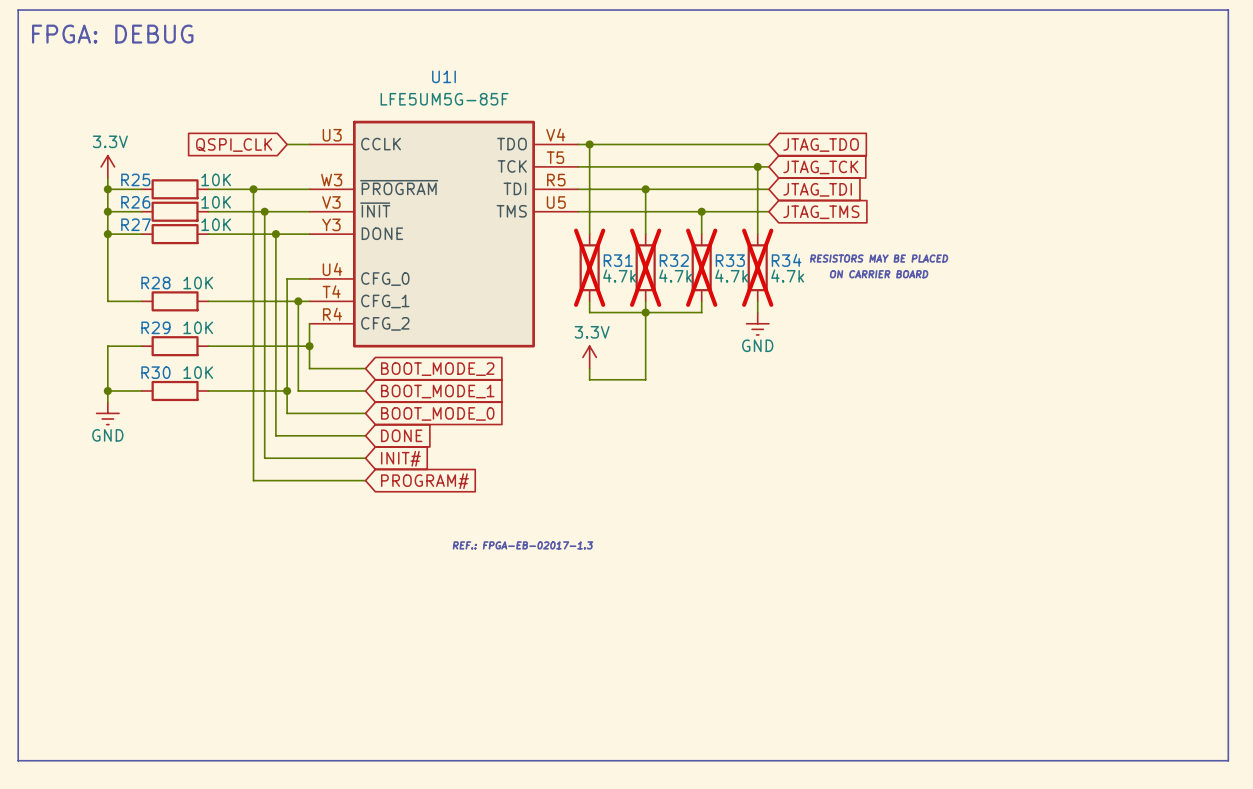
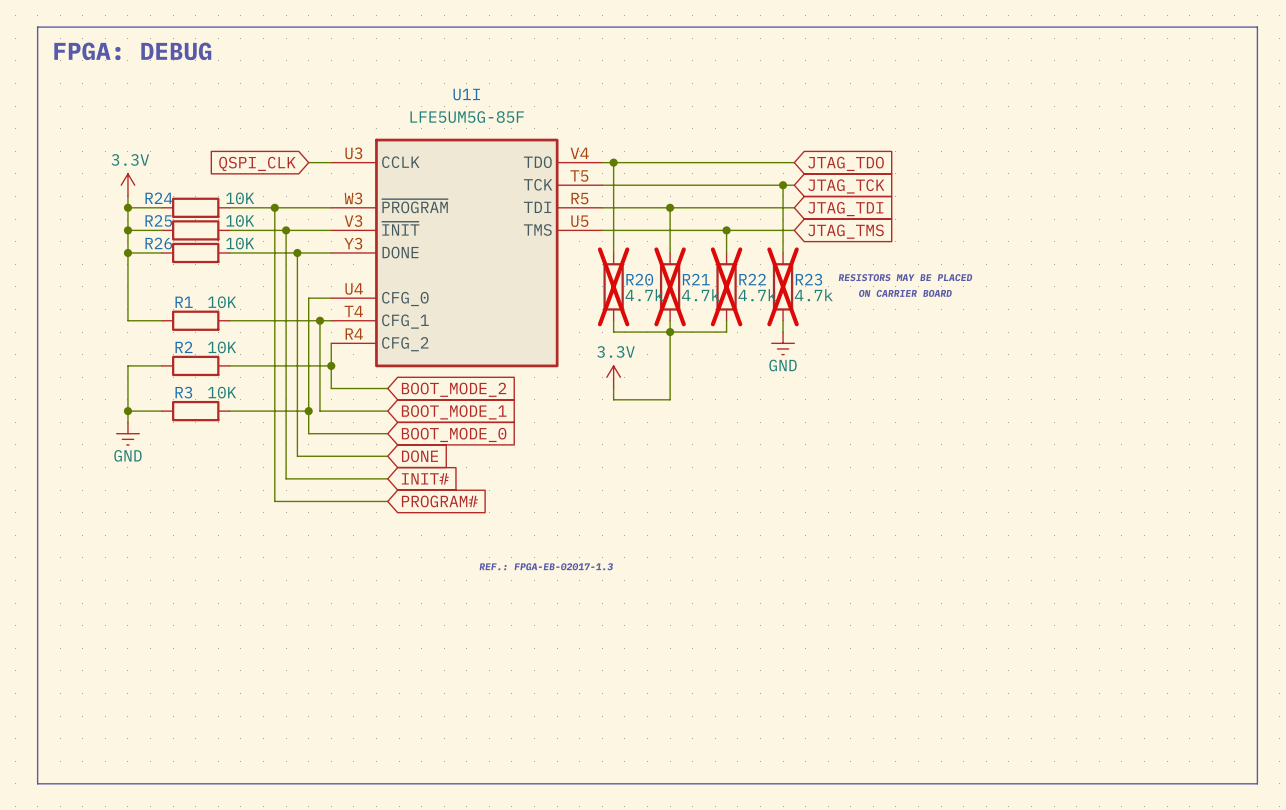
R25 name: R25 (135, 179) -> R24 (159, 198)
R26 name: R26 (135, 202) -> R25 (158, 220)
R27 name: R27 (136, 224) -> R26 (158, 243)
R31 name: R31 (618, 260) -> R20 (639, 279)
R32 name: R32 (674, 260) -> R21 (696, 279)
R33 name: R33 (730, 260) -> R22 (752, 279)
R34 name: R34 (786, 260) -> R23 (808, 279)
R28 name: R28 (155, 283) -> R1 (184, 302)
R29 name: R29 (155, 327) -> R2 (183, 347)
R30 name: R30 (155, 372) -> R3 (183, 392)

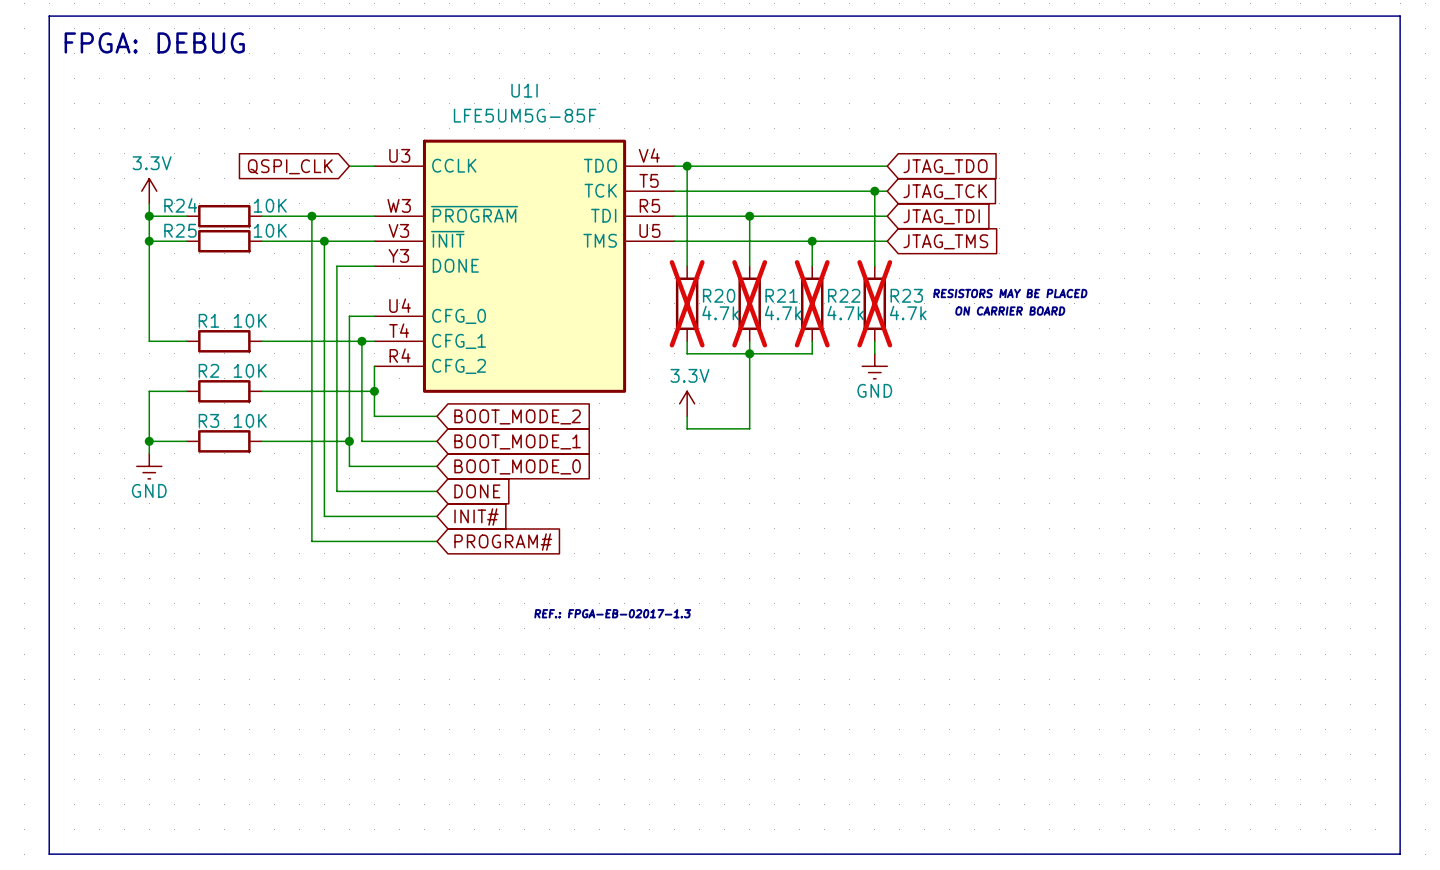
wire: (127, 252) (161, 252) -> none
junction: (127, 252) -> none
R26: 10K (195, 252) -> none
wire: (229, 252) (297, 252) -> none
junction: (297, 252) -> none

